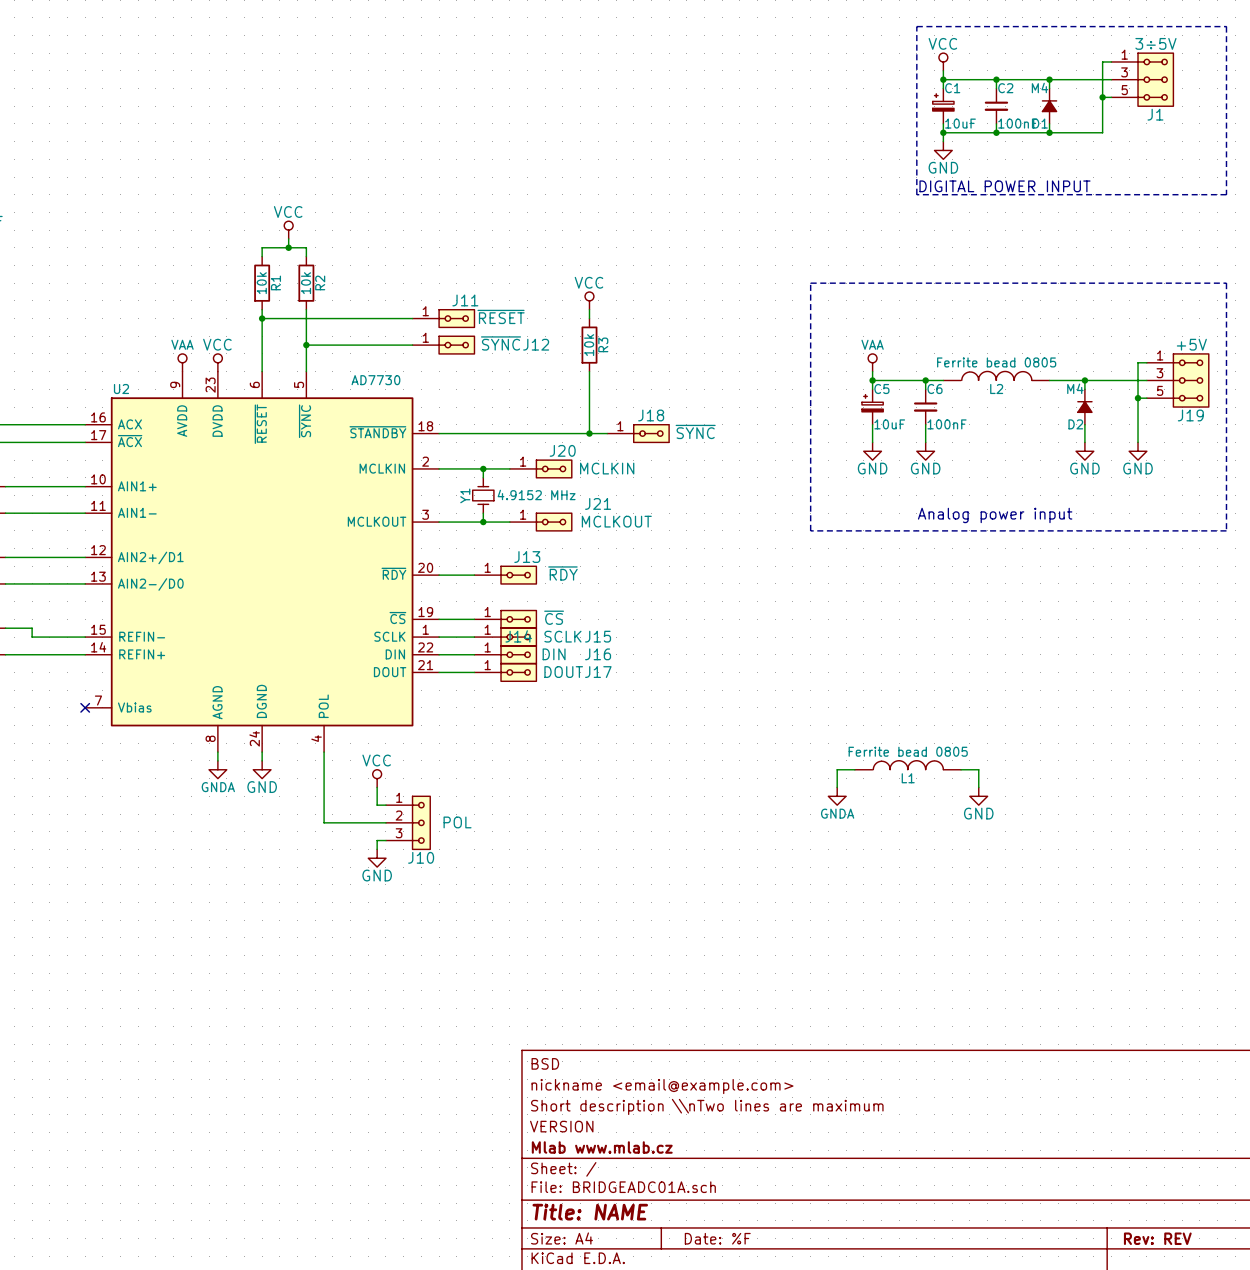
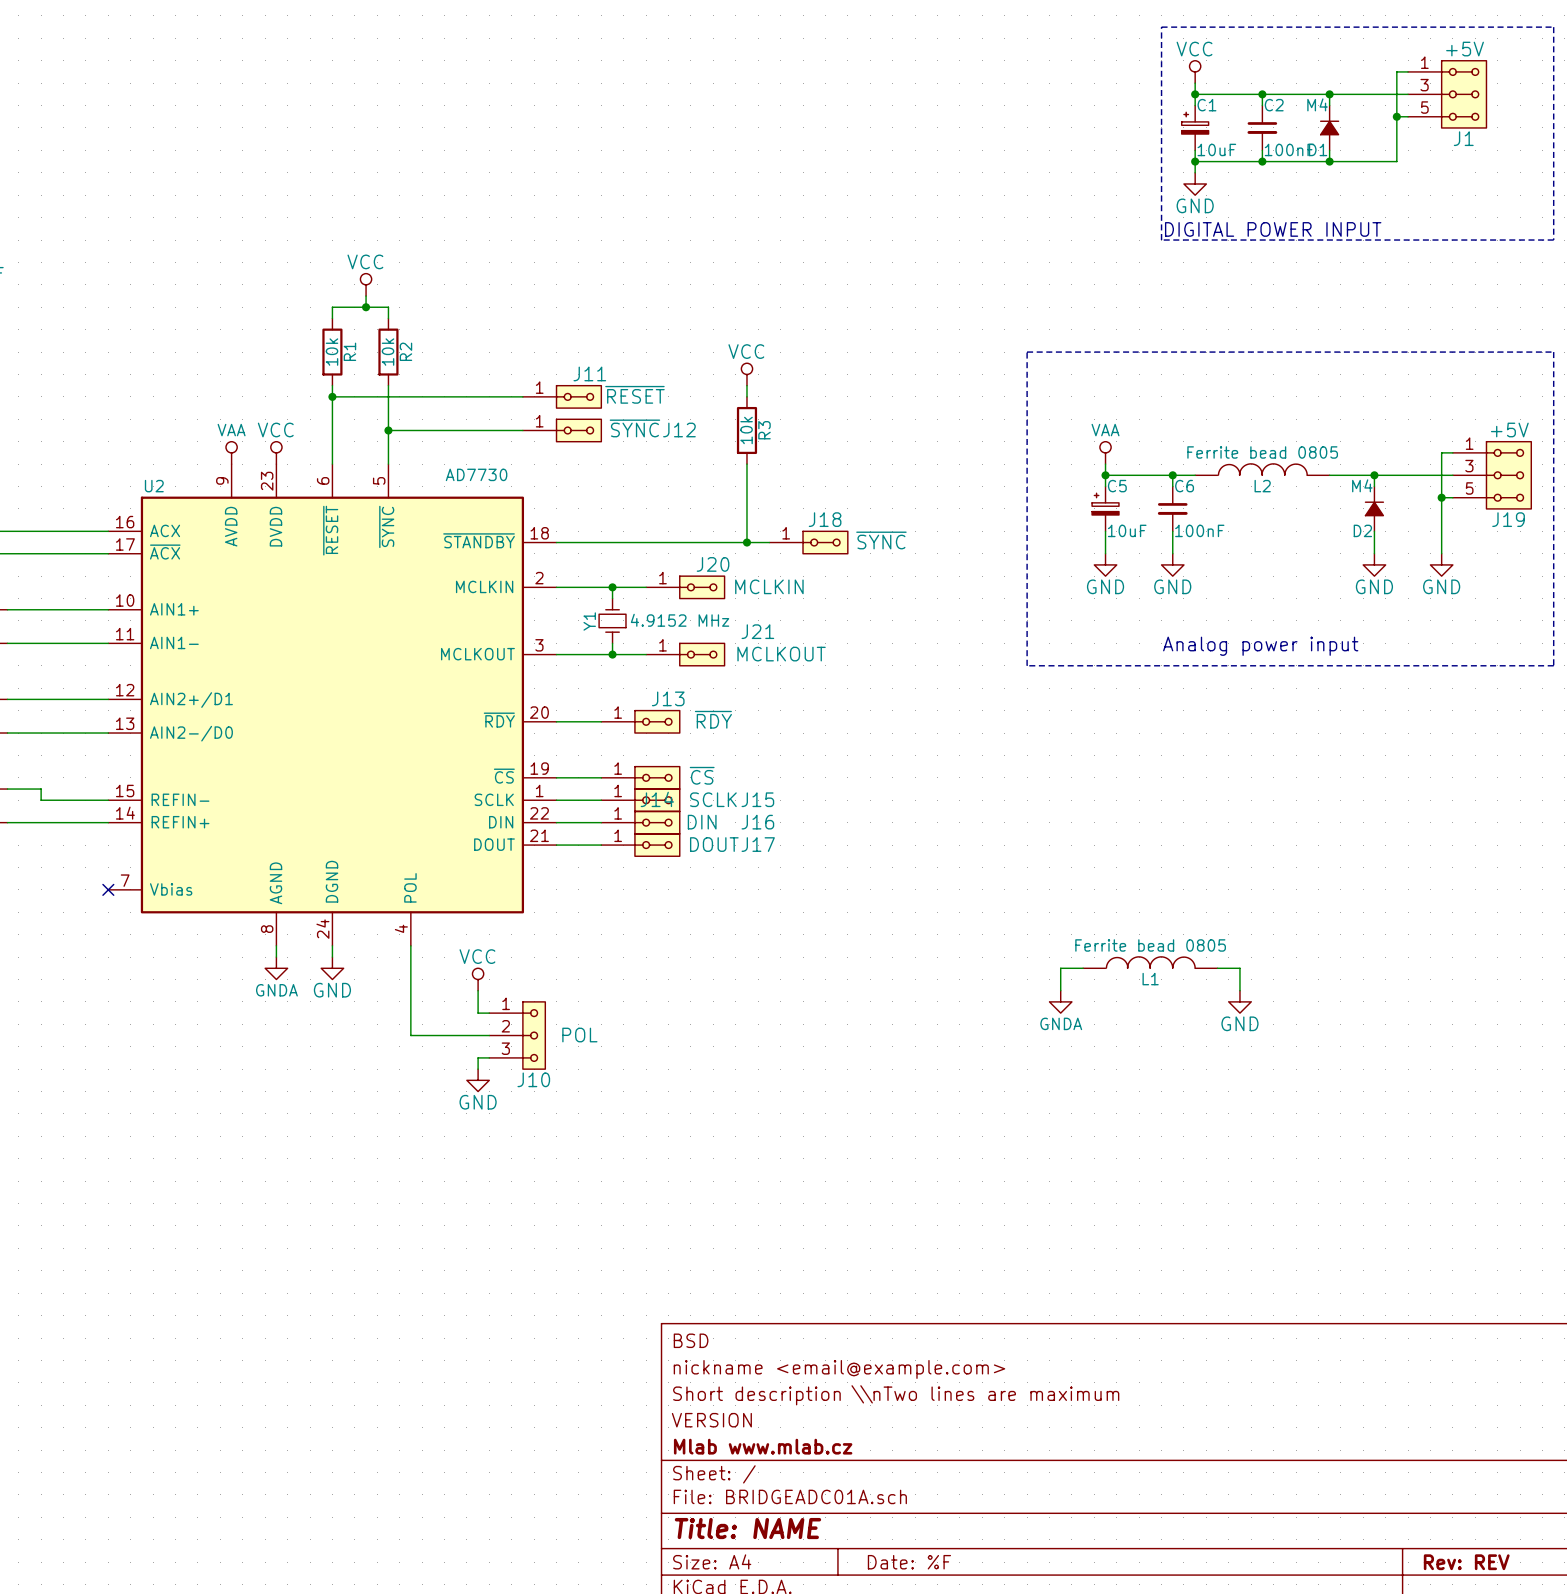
J1 value: 3÷5V (1155, 43) -> +5V (1465, 49)

